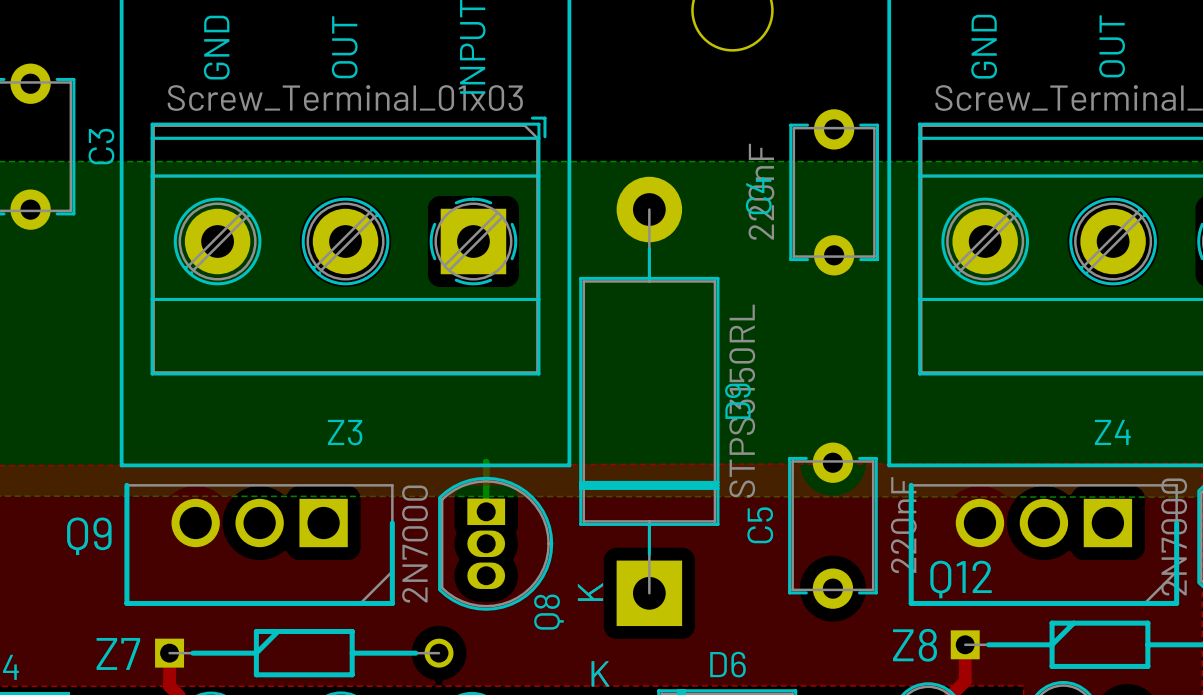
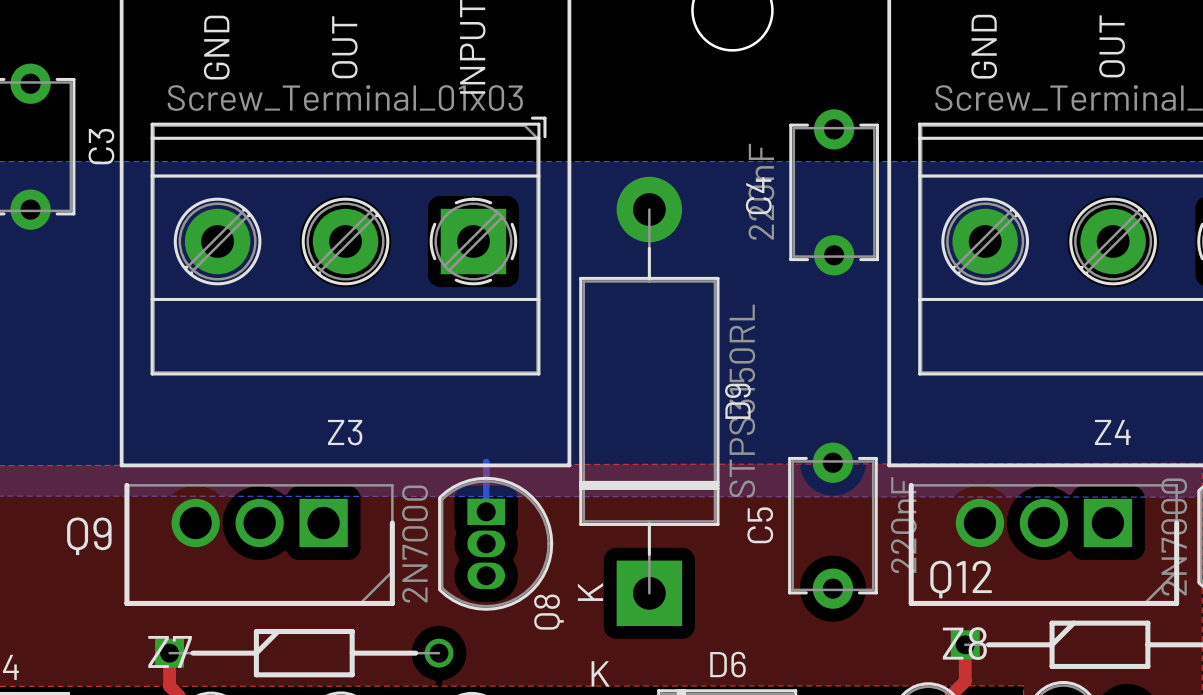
Z8 name position: Z8 (915, 645) -> Z8 (964, 643)
Z7 name position: Z7 (118, 653) -> Z7 (170, 651)

